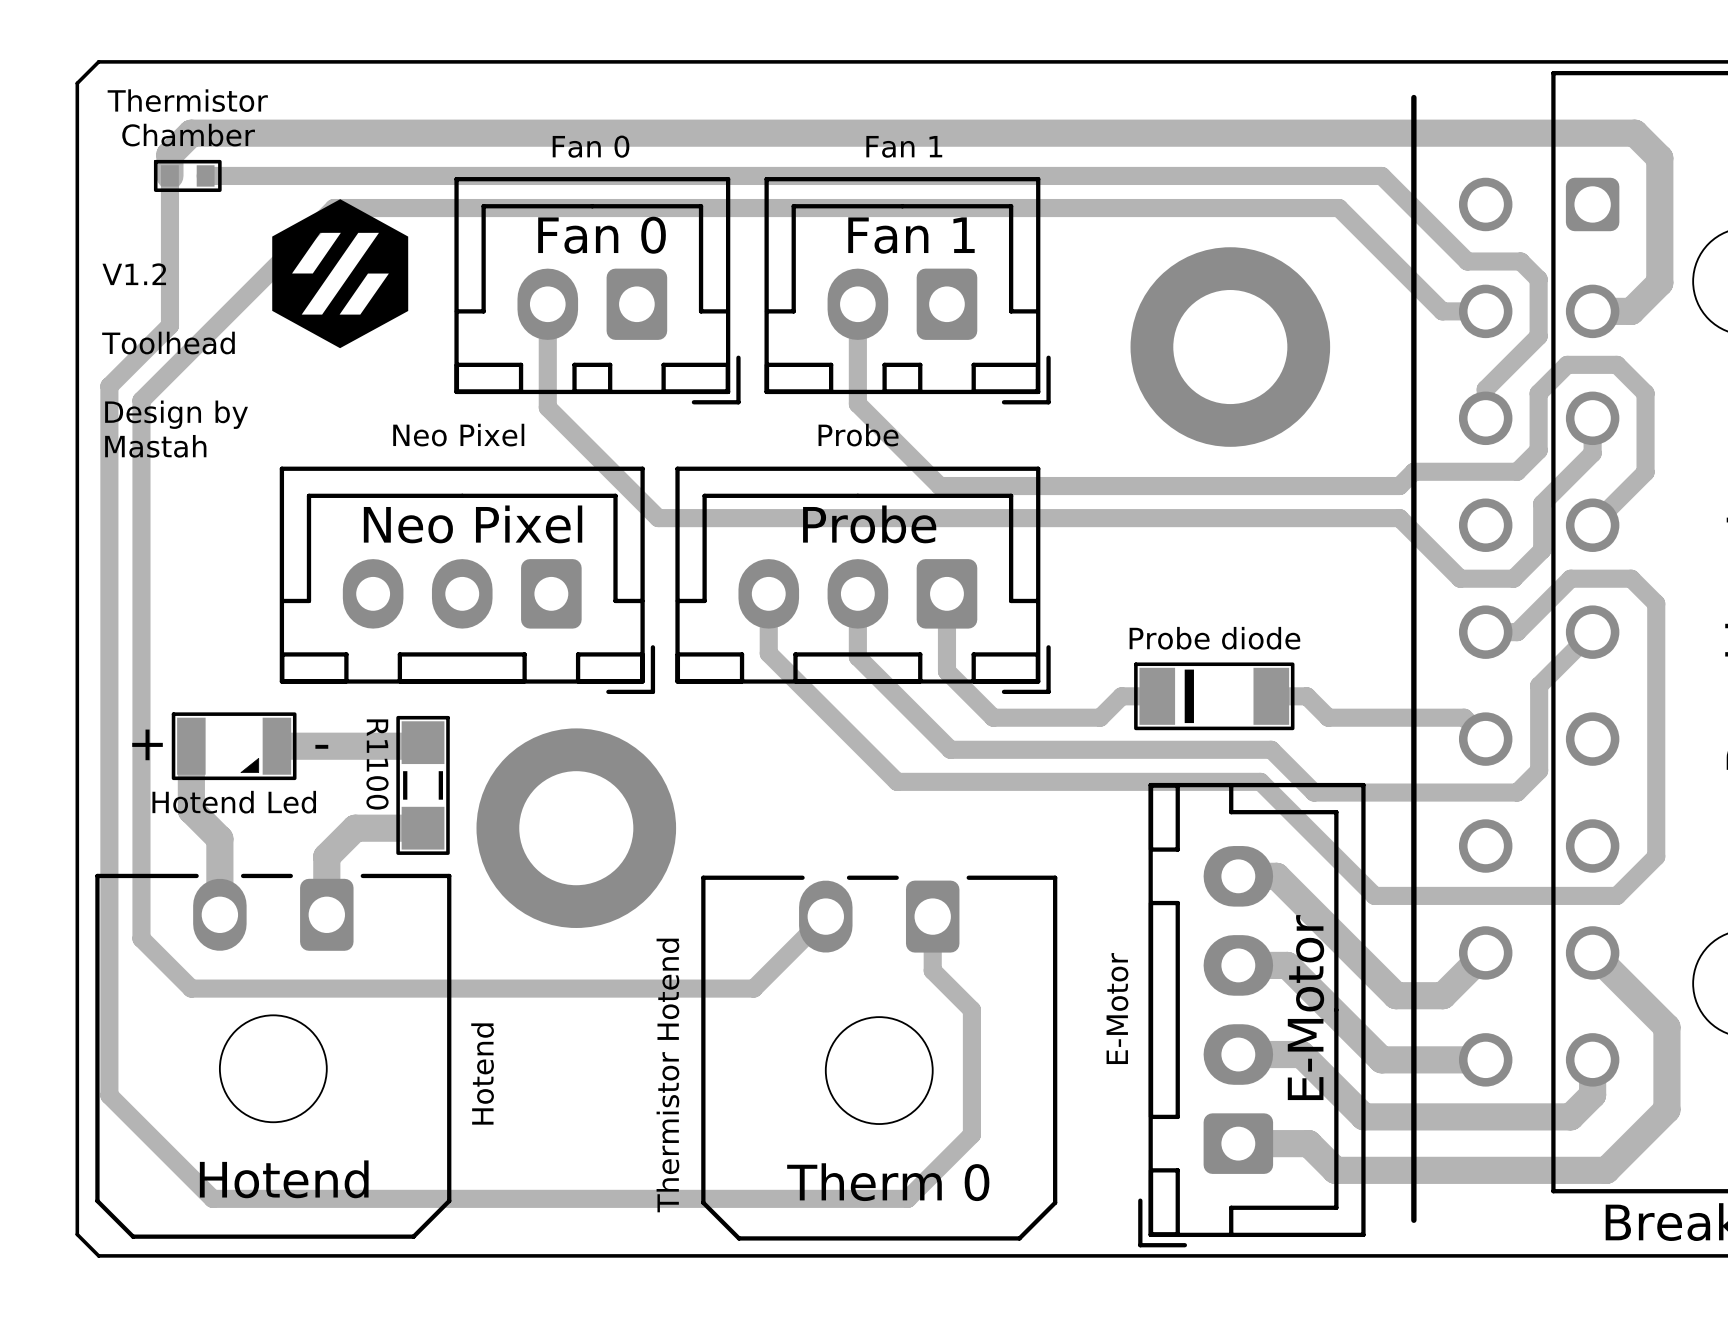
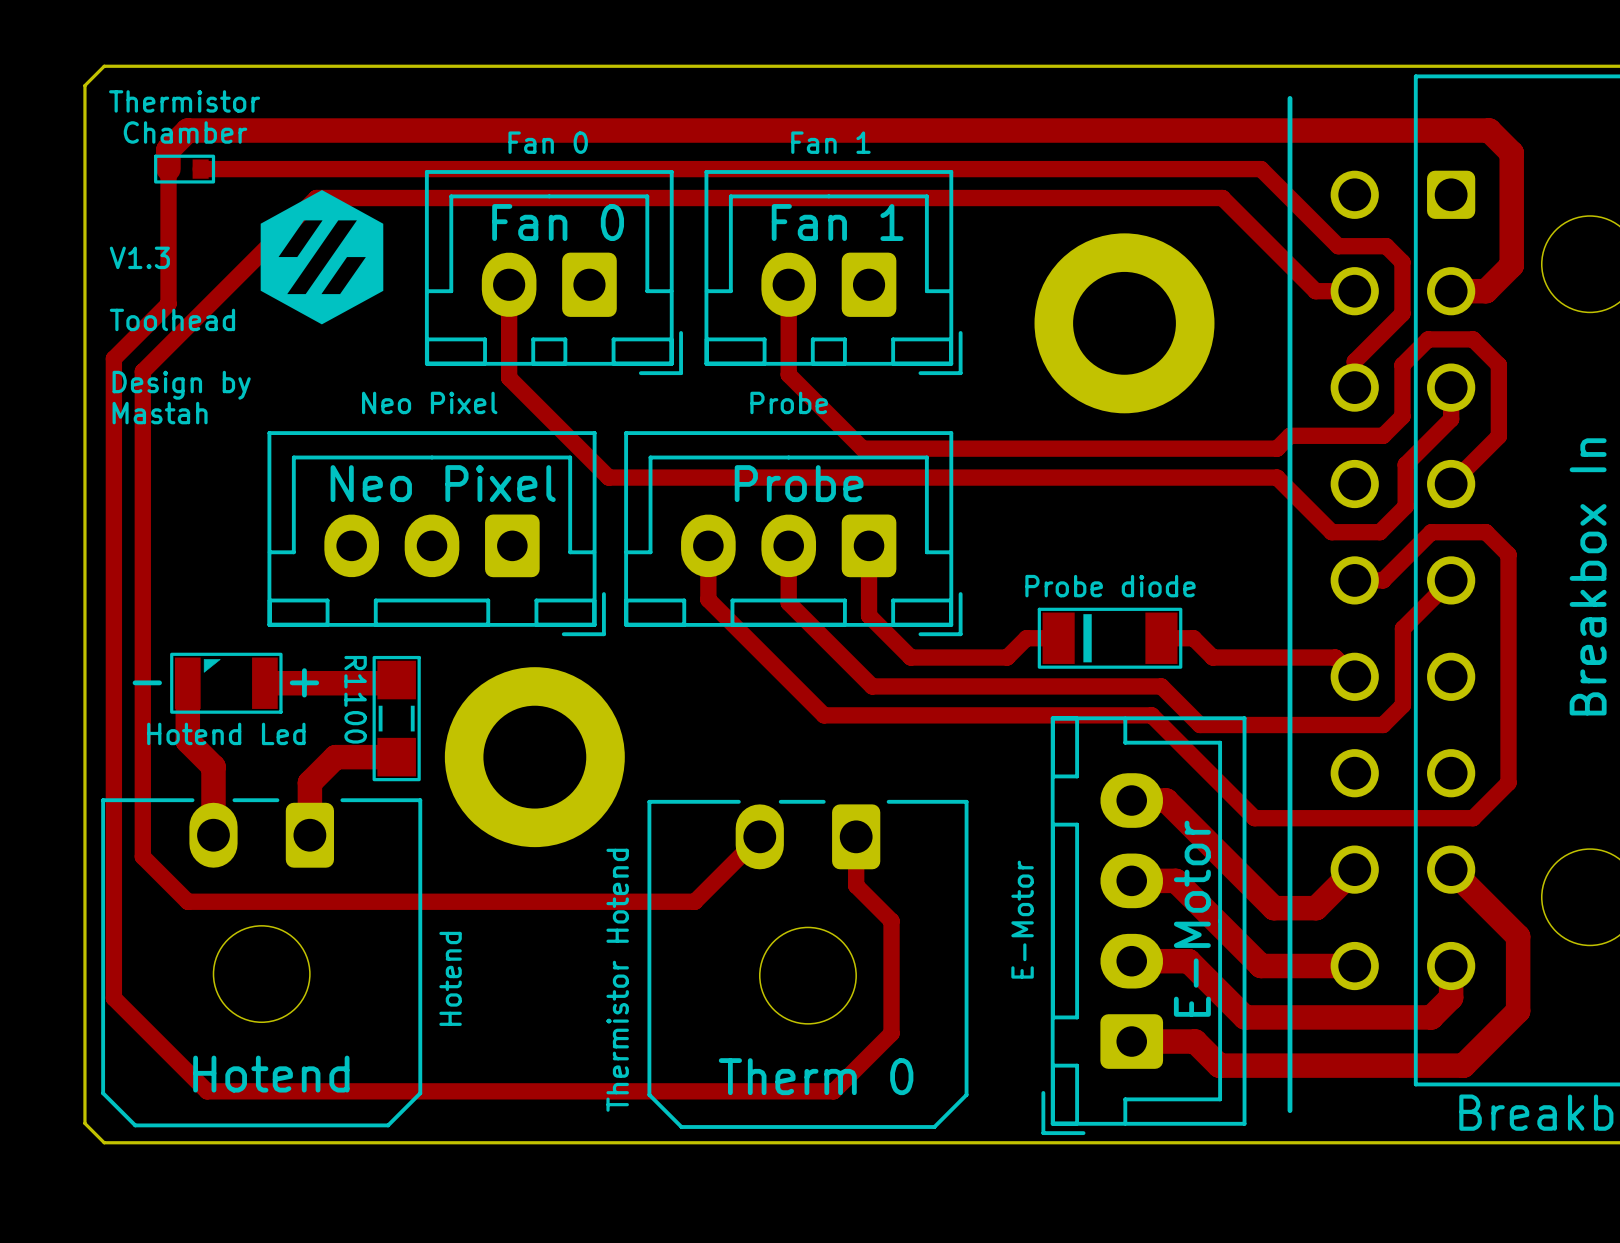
text: V1.2 (134, 274) -> V1.3 (139, 257)
Hotend Led rotation: 0° (234, 746) -> 180° (226, 683)

